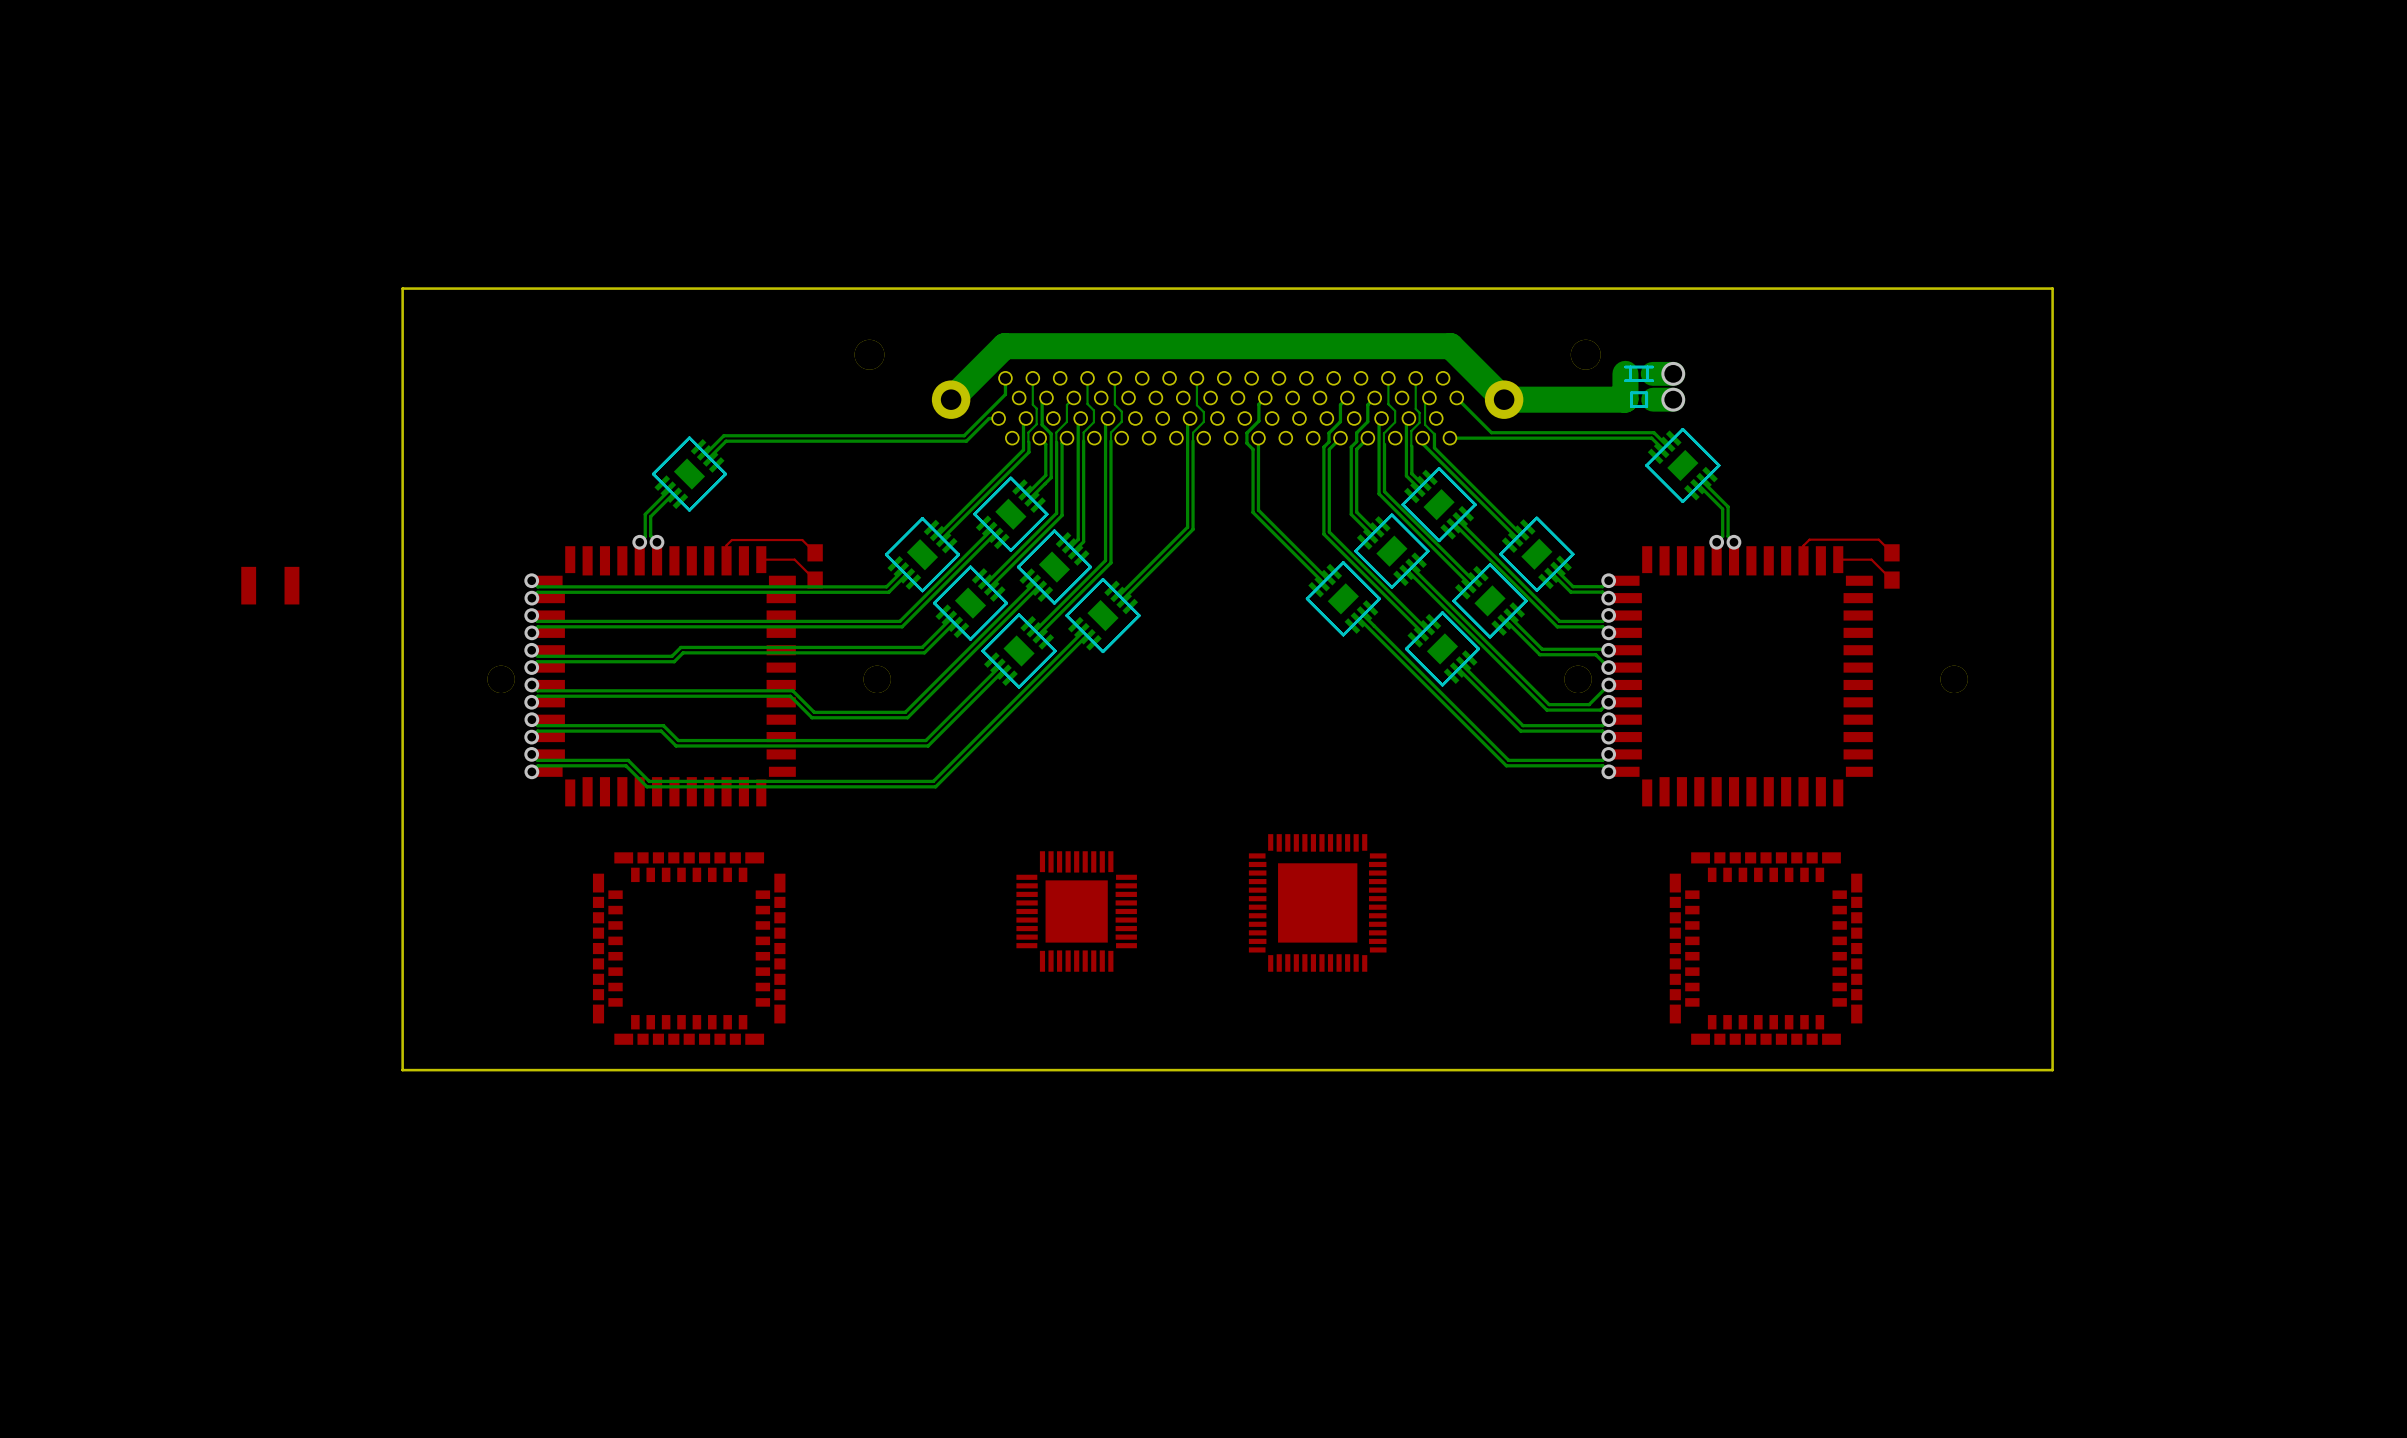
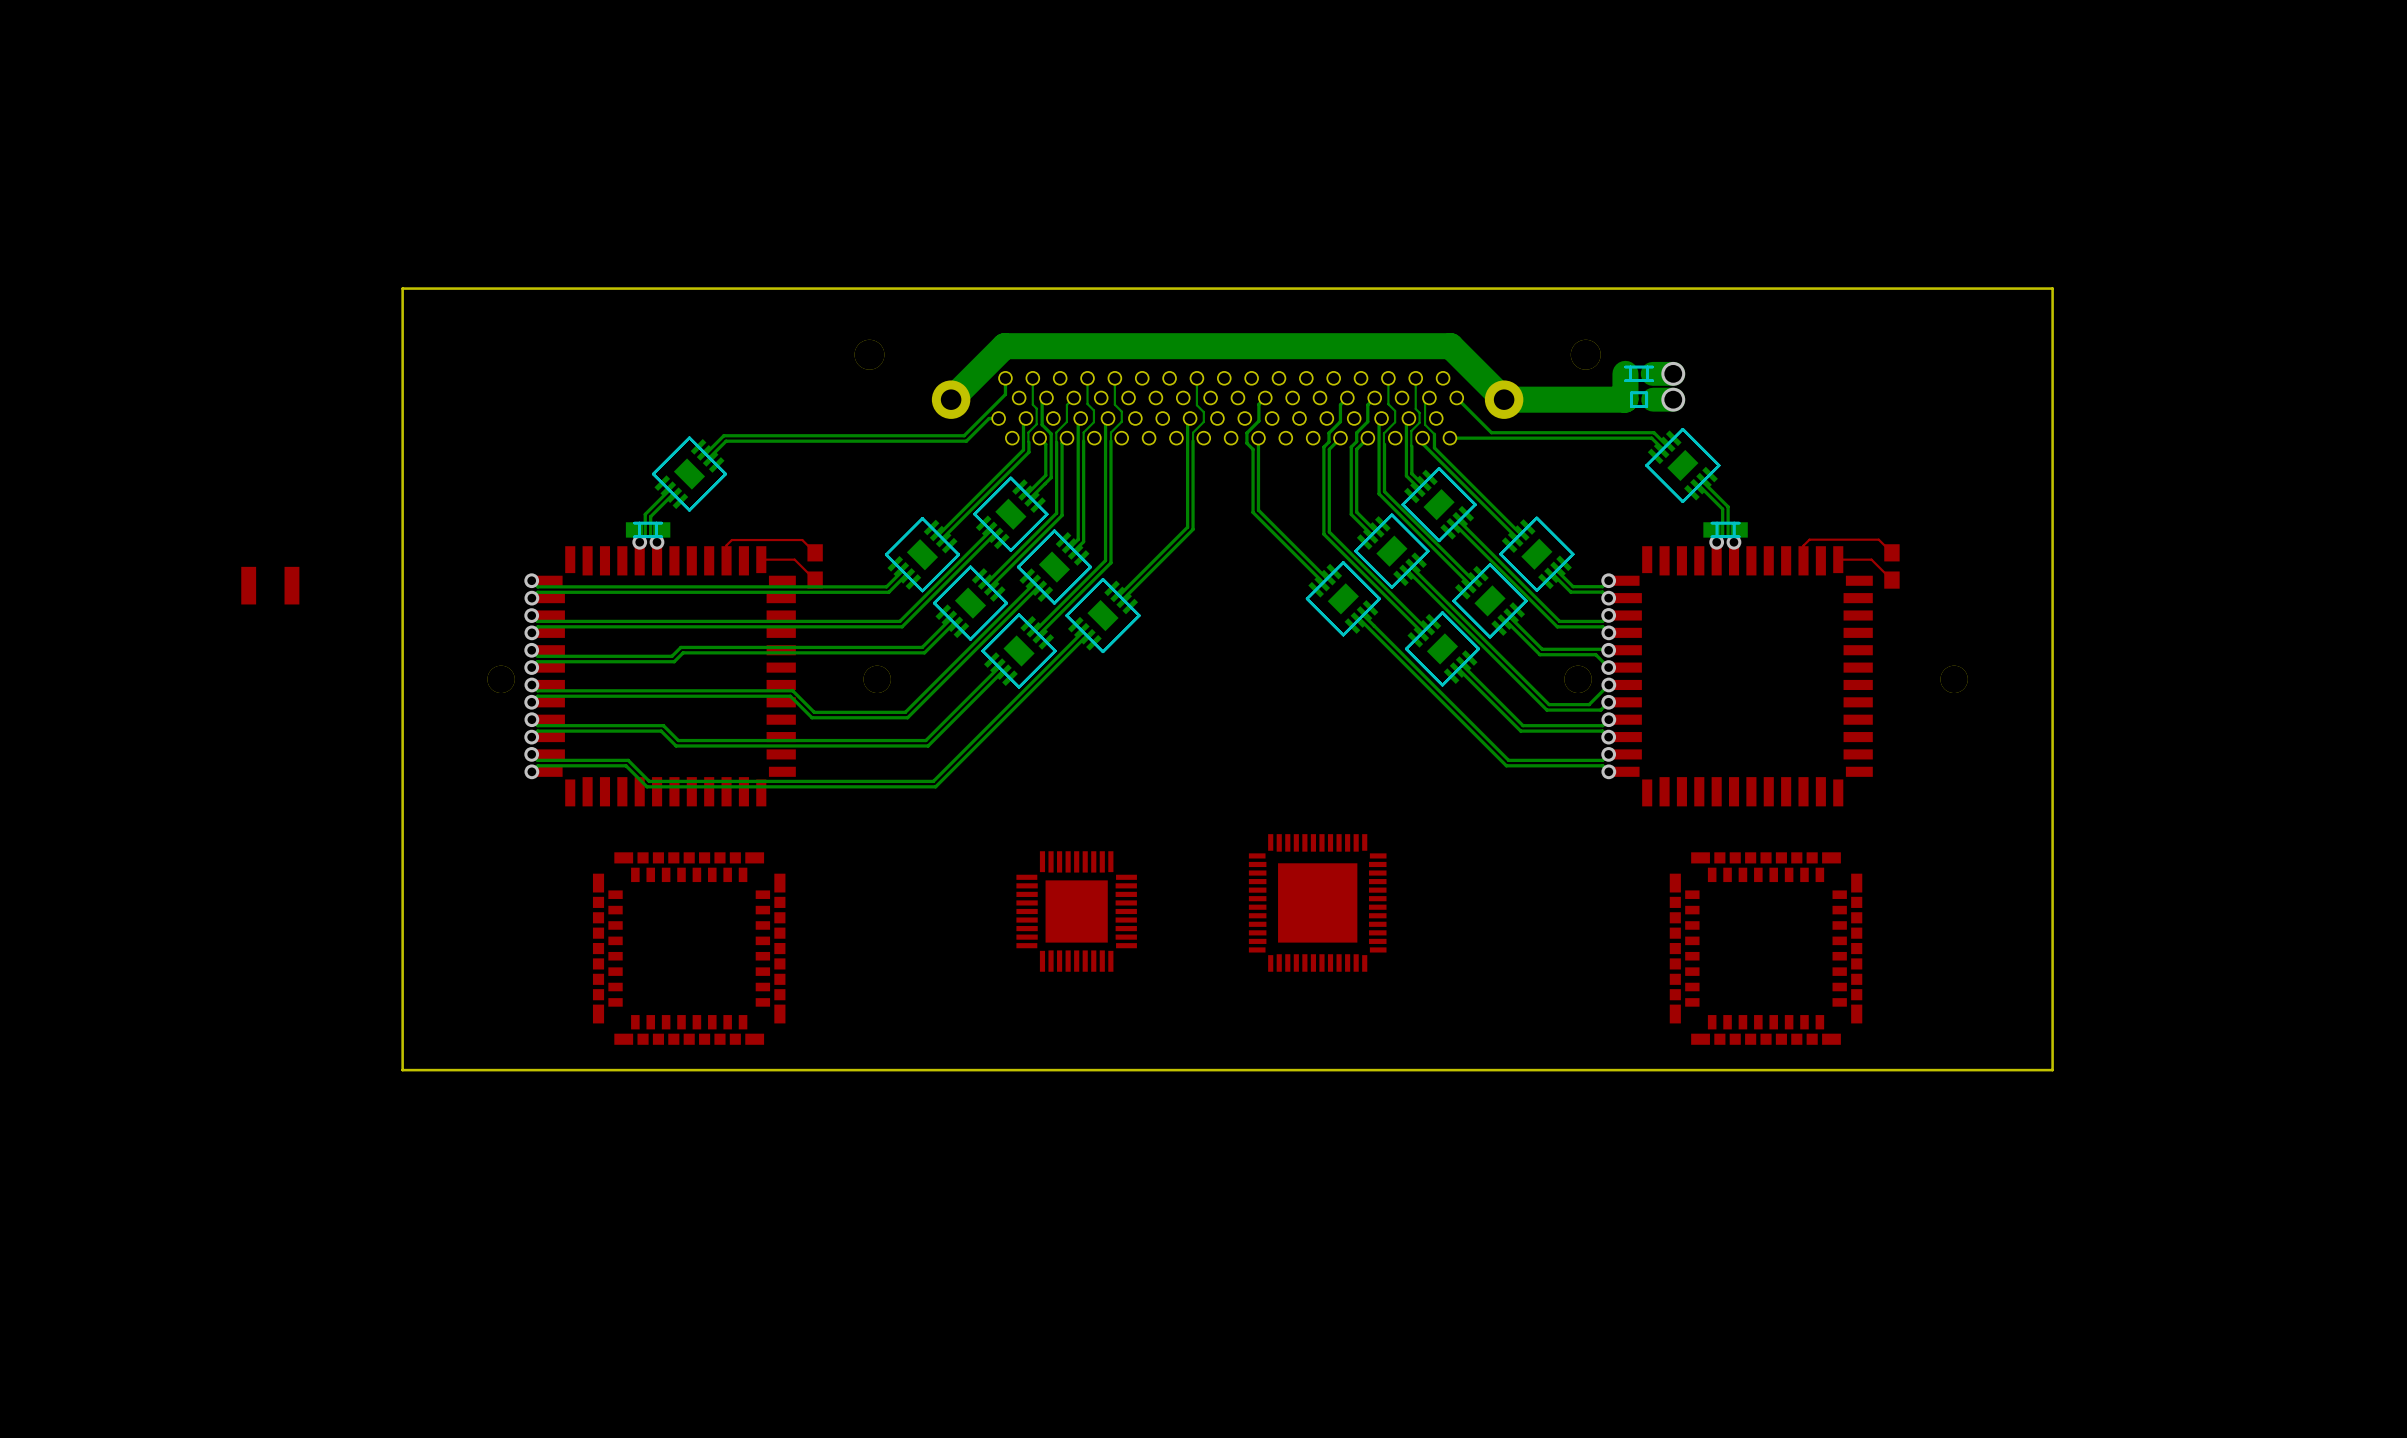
part: none -> (648, 529)
part: none -> (1725, 529)

